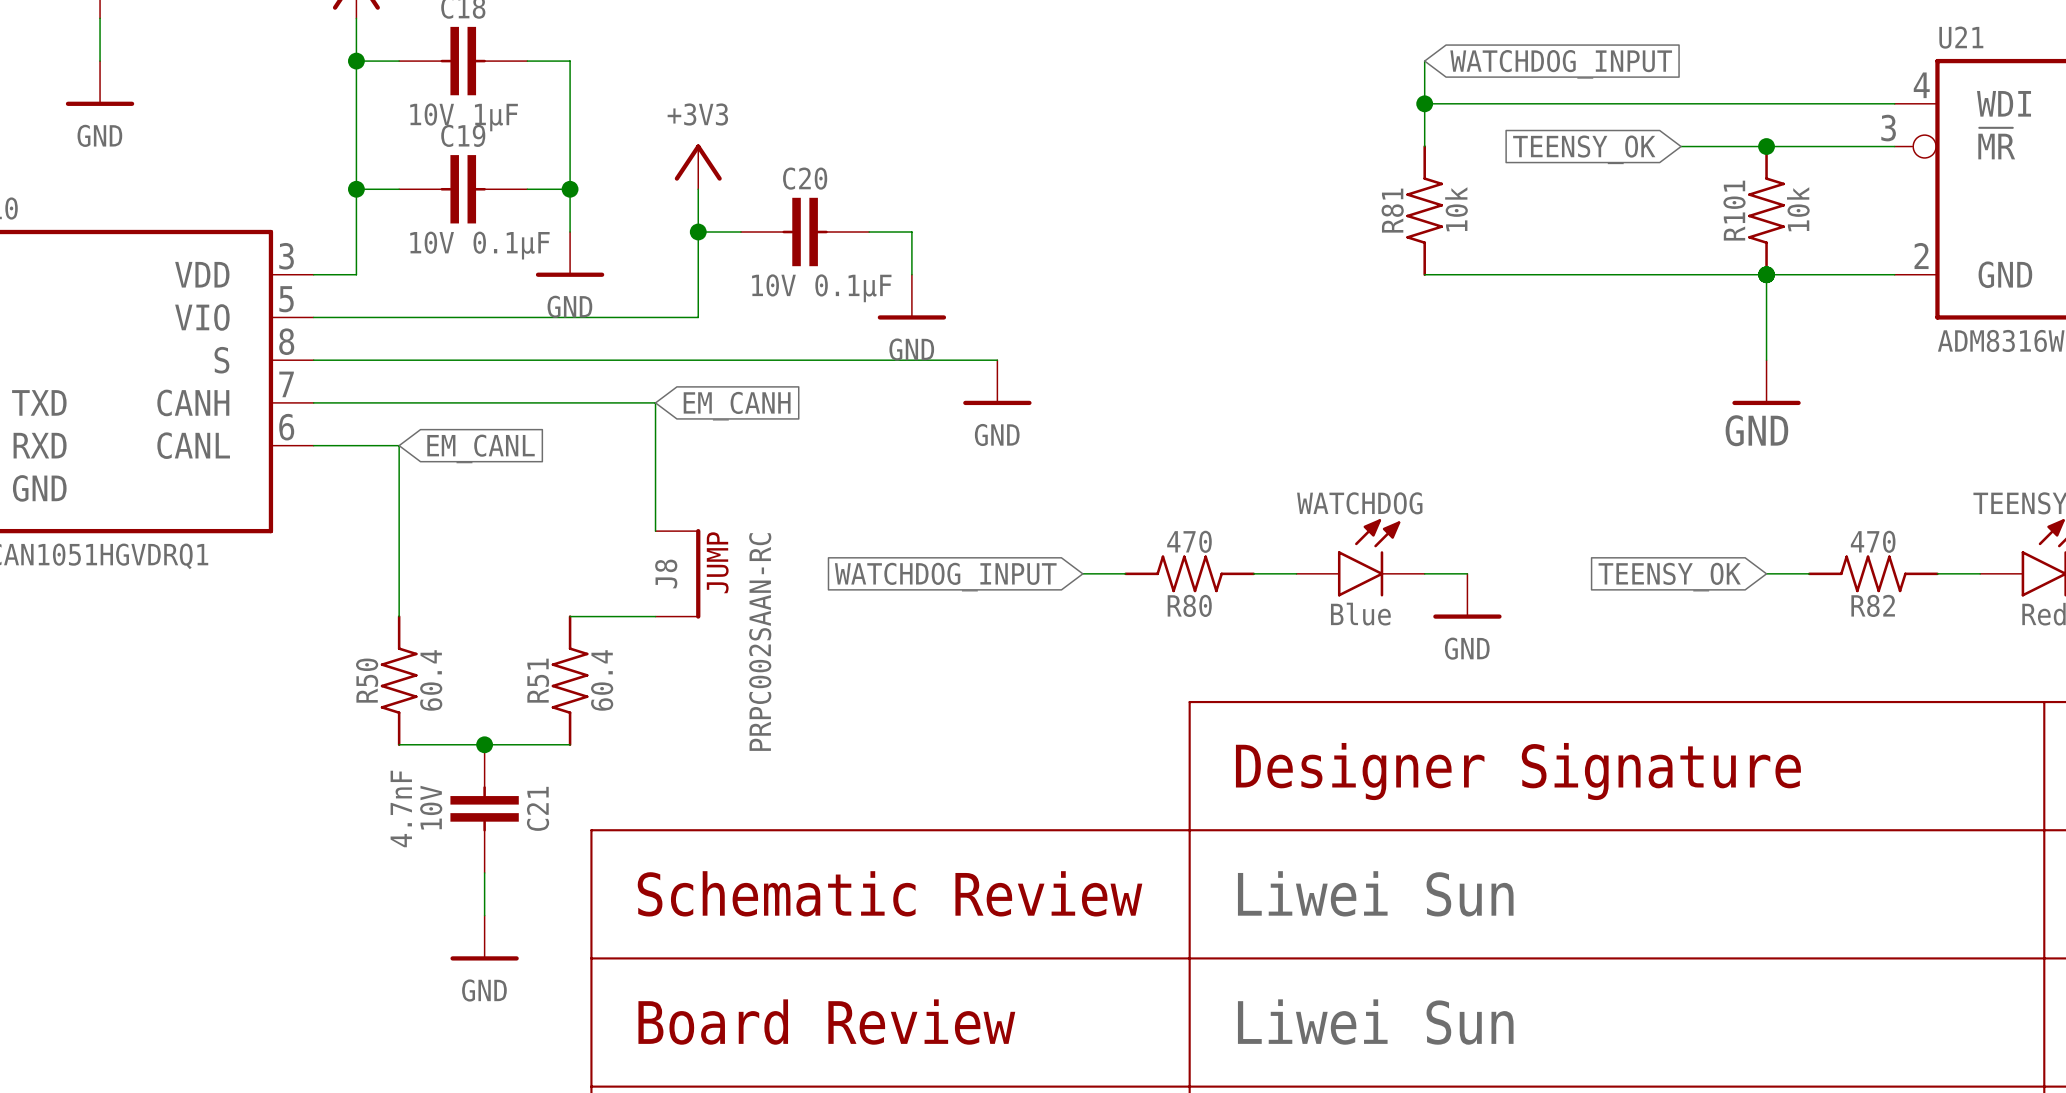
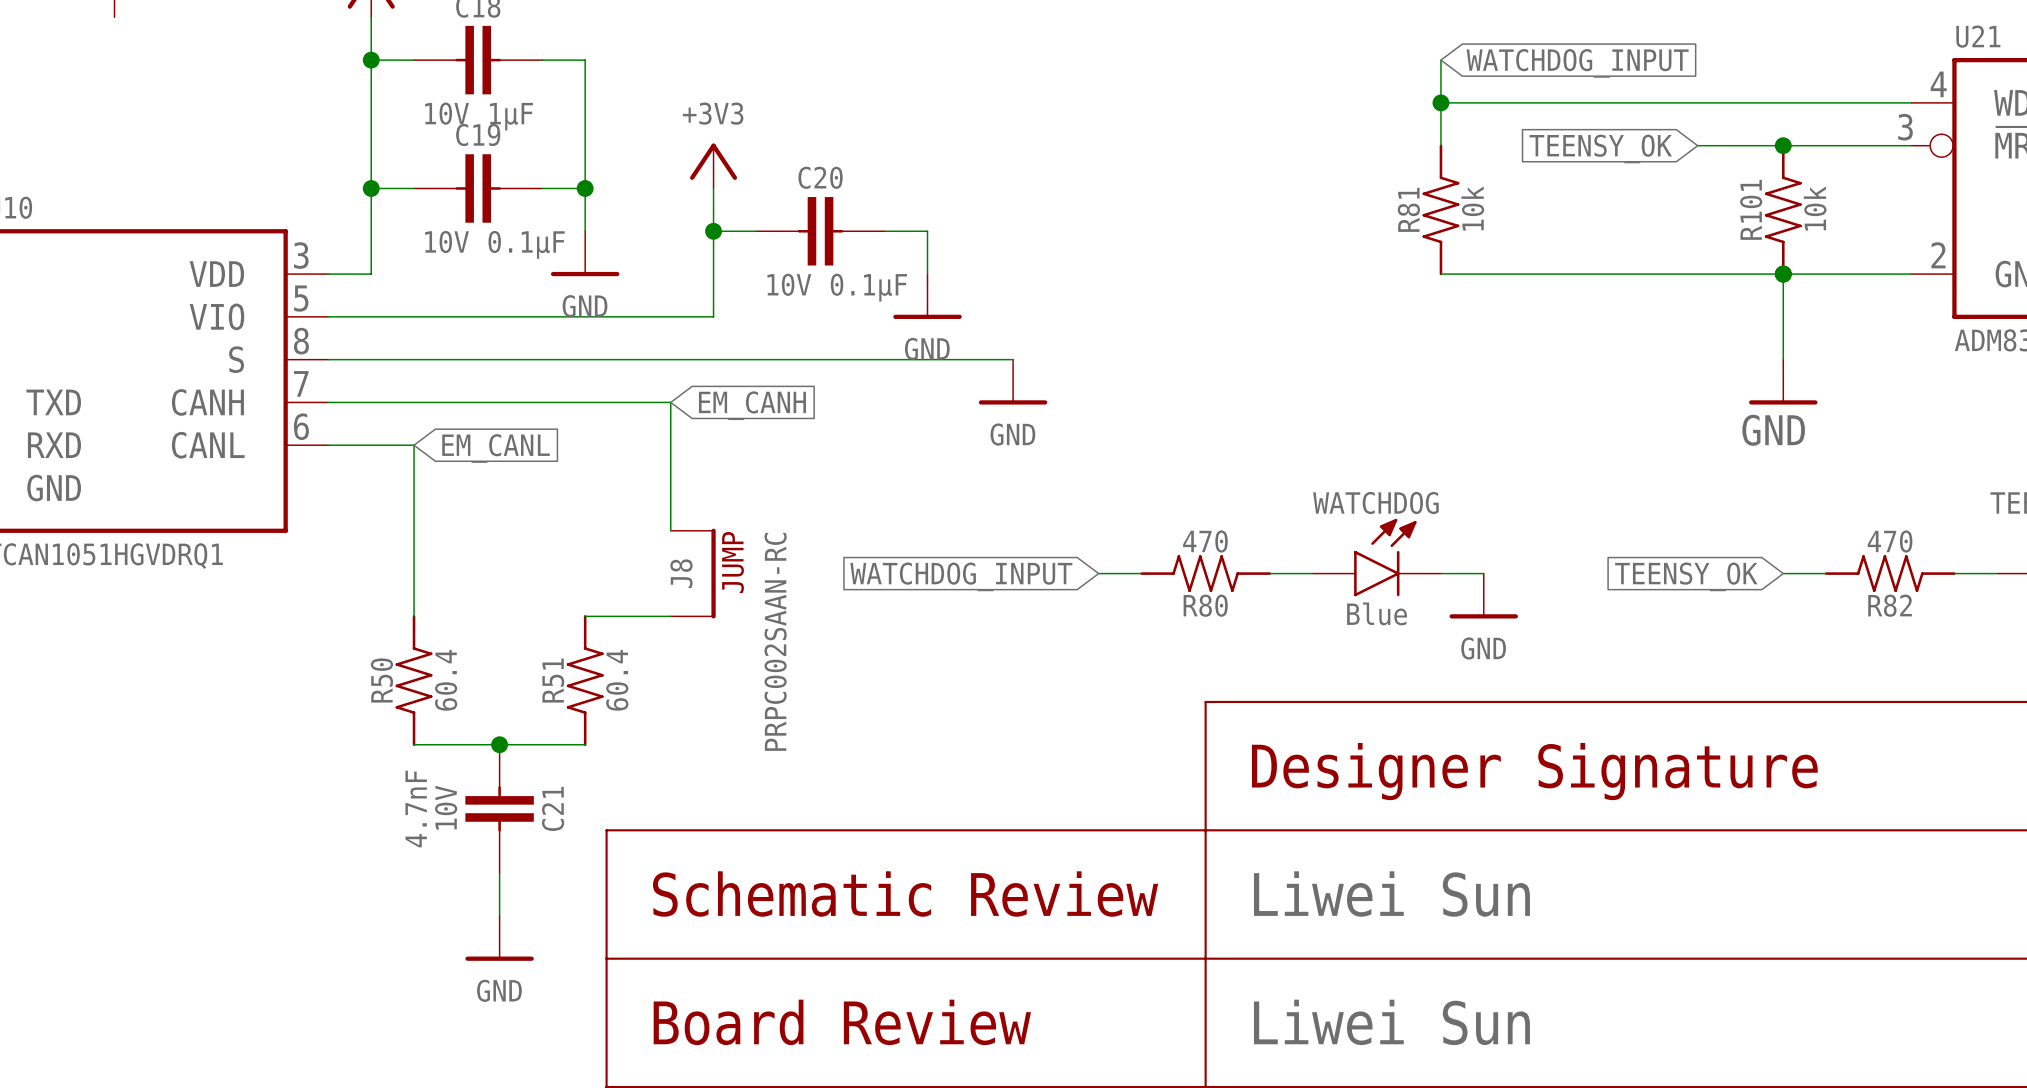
wire: (100, 18) (100, 61) -> none
power symbol: GND (100, 83) -> none

